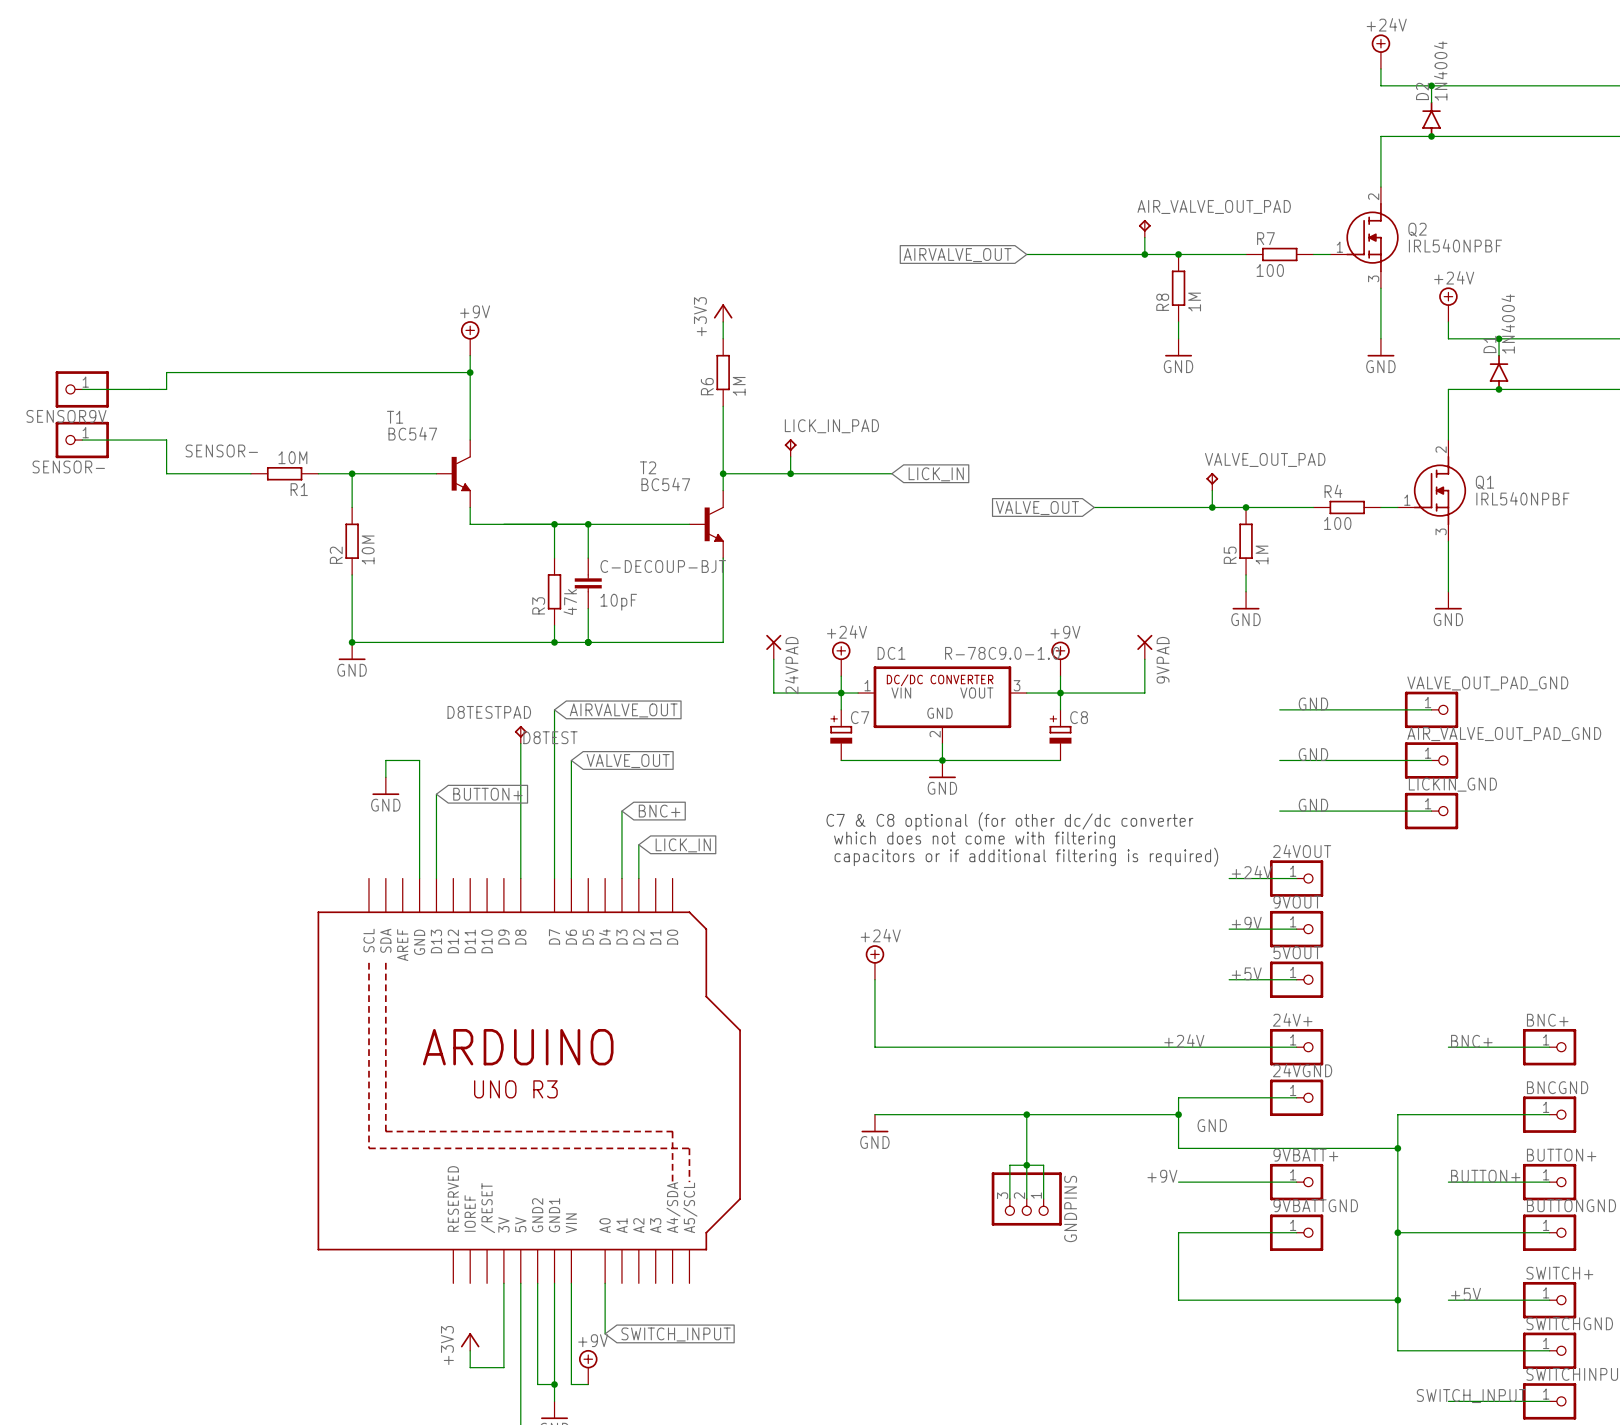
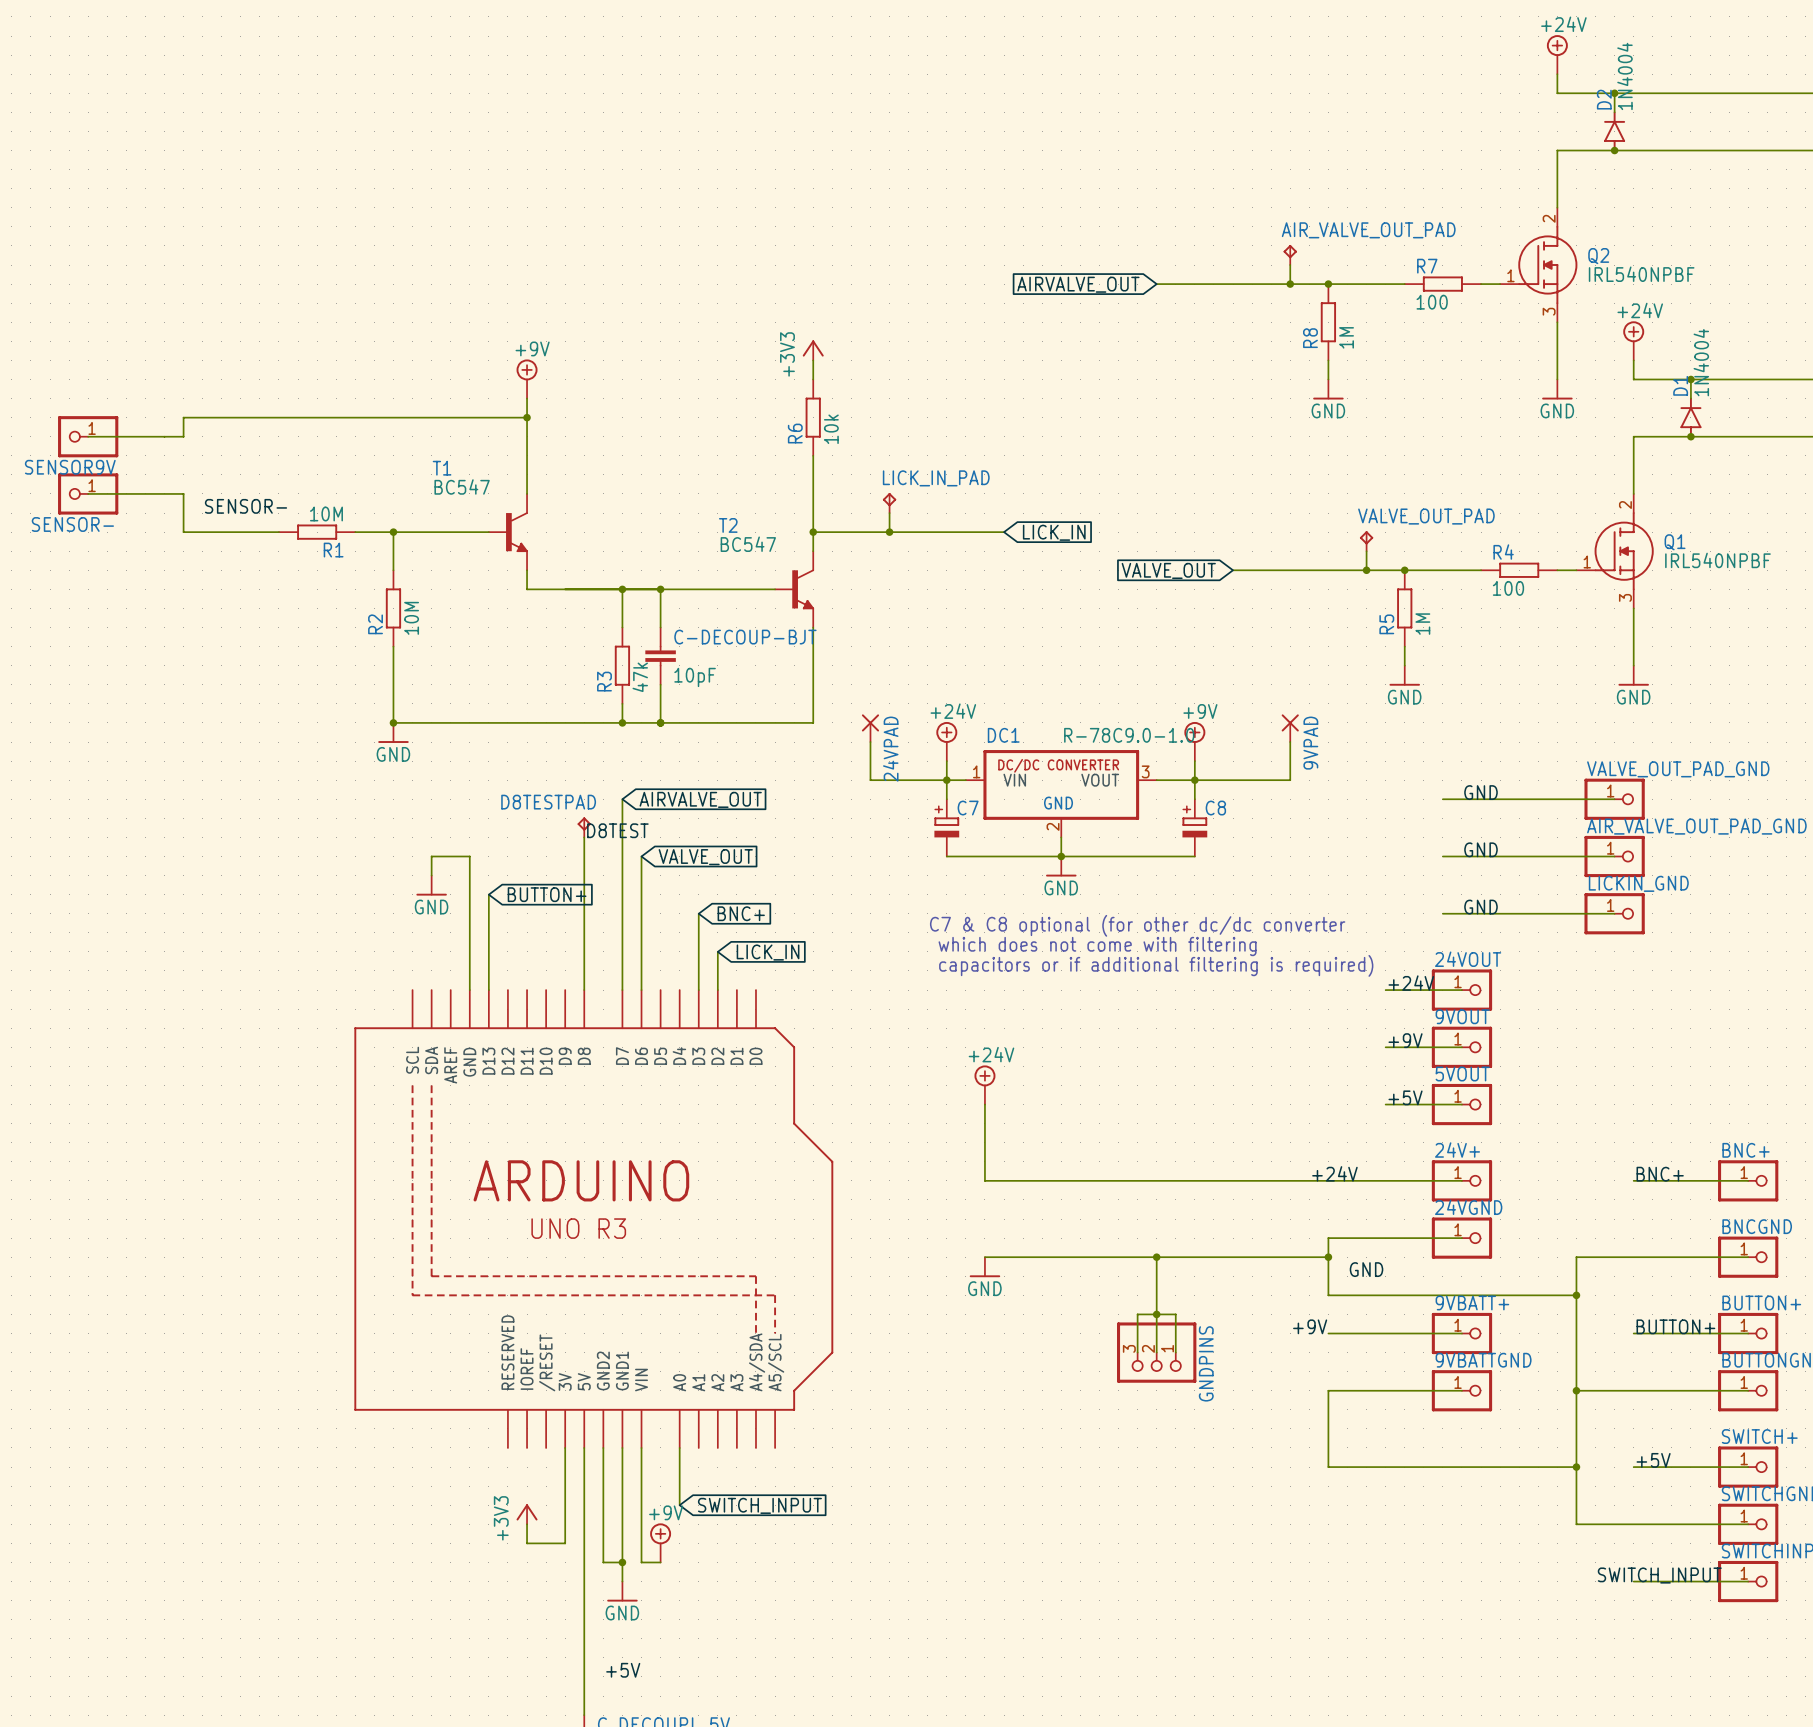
R6 value: 1M (739, 386) -> 10k (831, 429)

